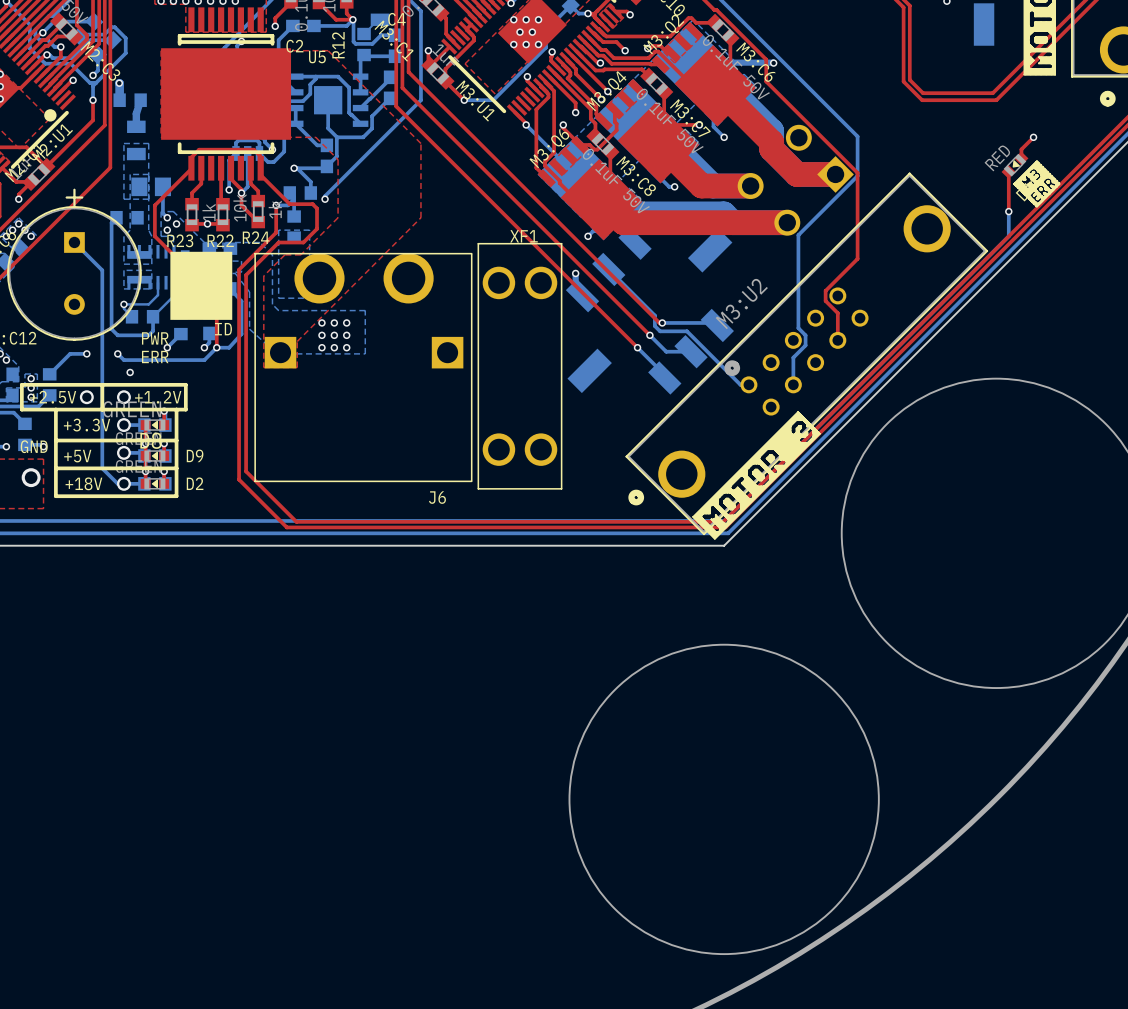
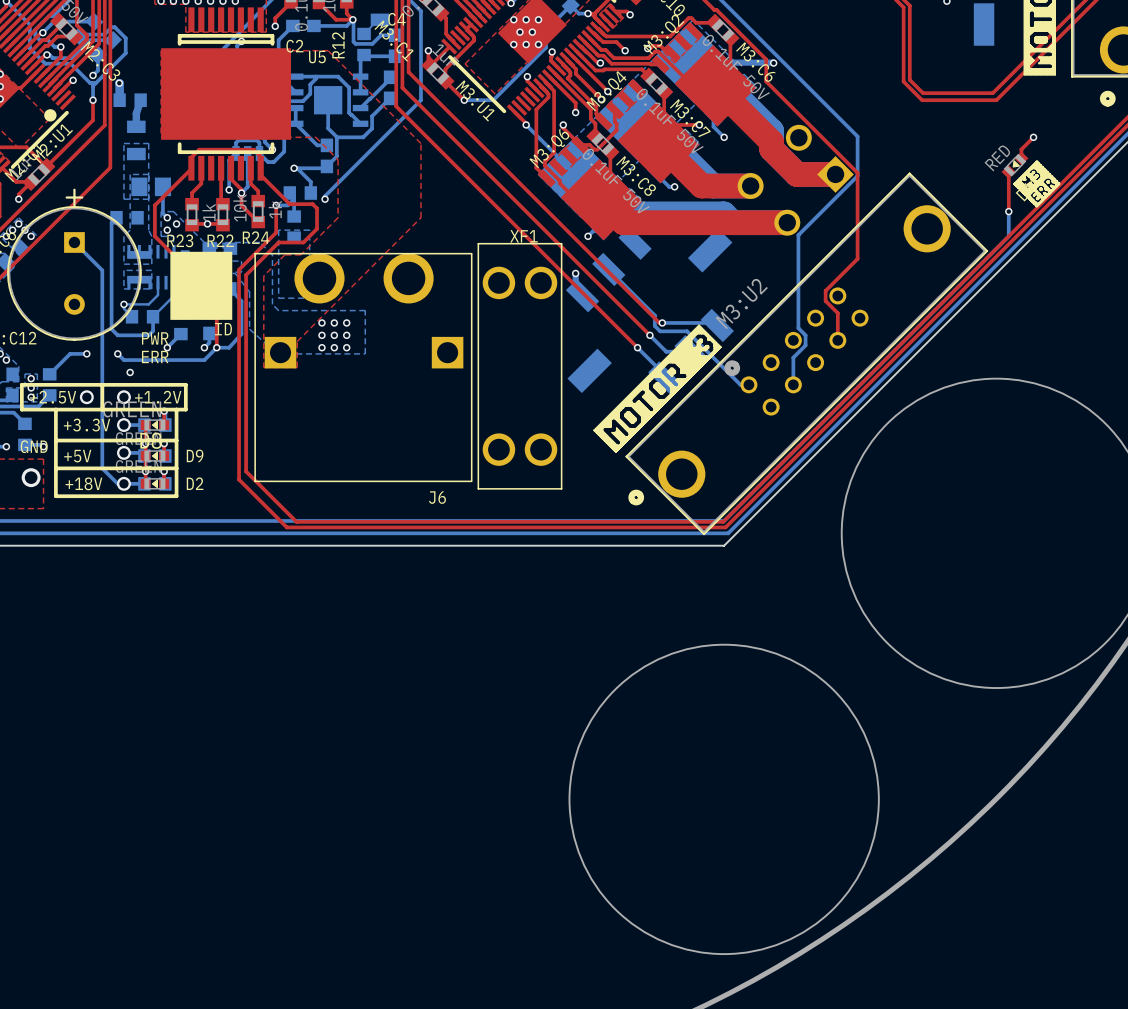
drawing position: (756, 475) -> (657, 388)

